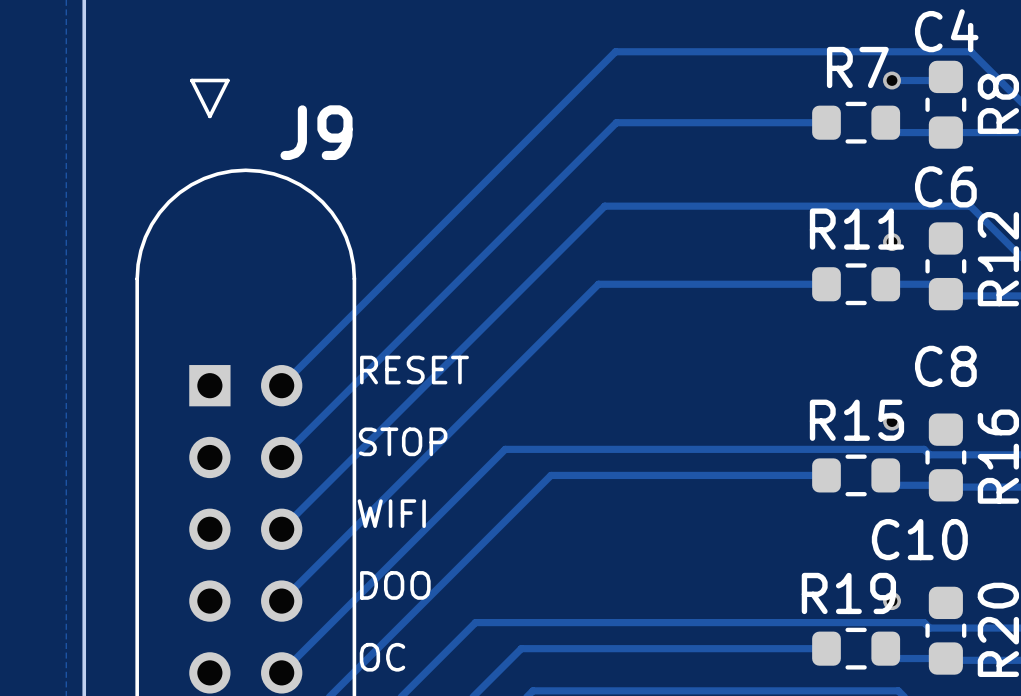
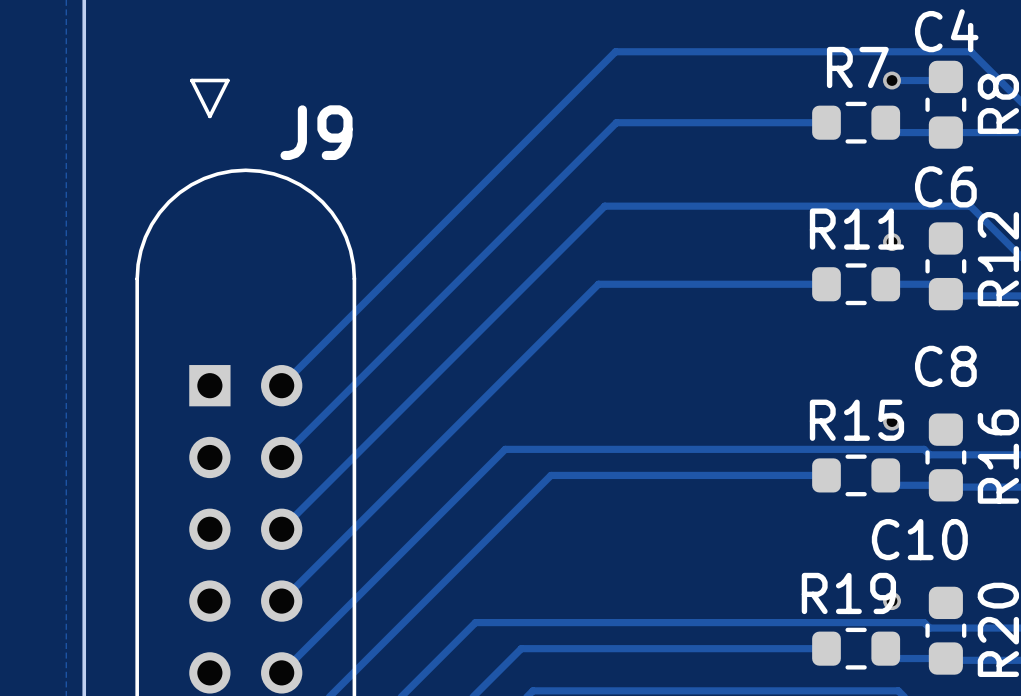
text: RESET (414, 370) -> none
text: STOP (403, 441) -> none
text: WIFI (391, 513) -> none
text: DOO (395, 585) -> none
text: OC (382, 657) -> none

